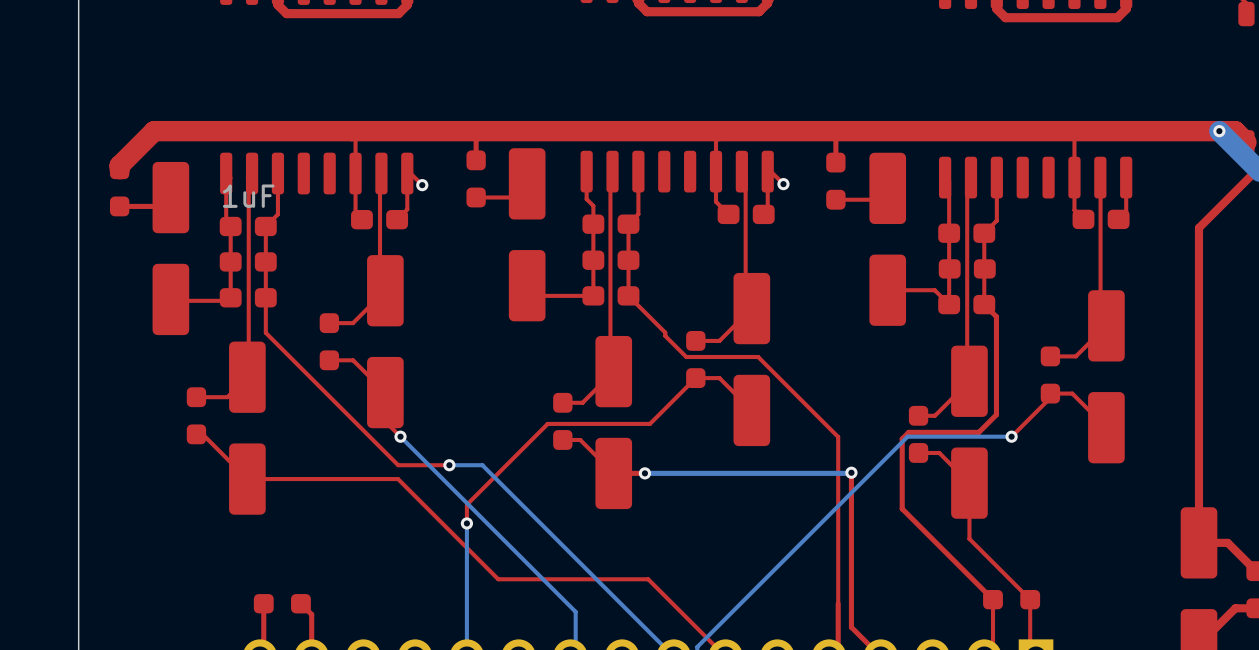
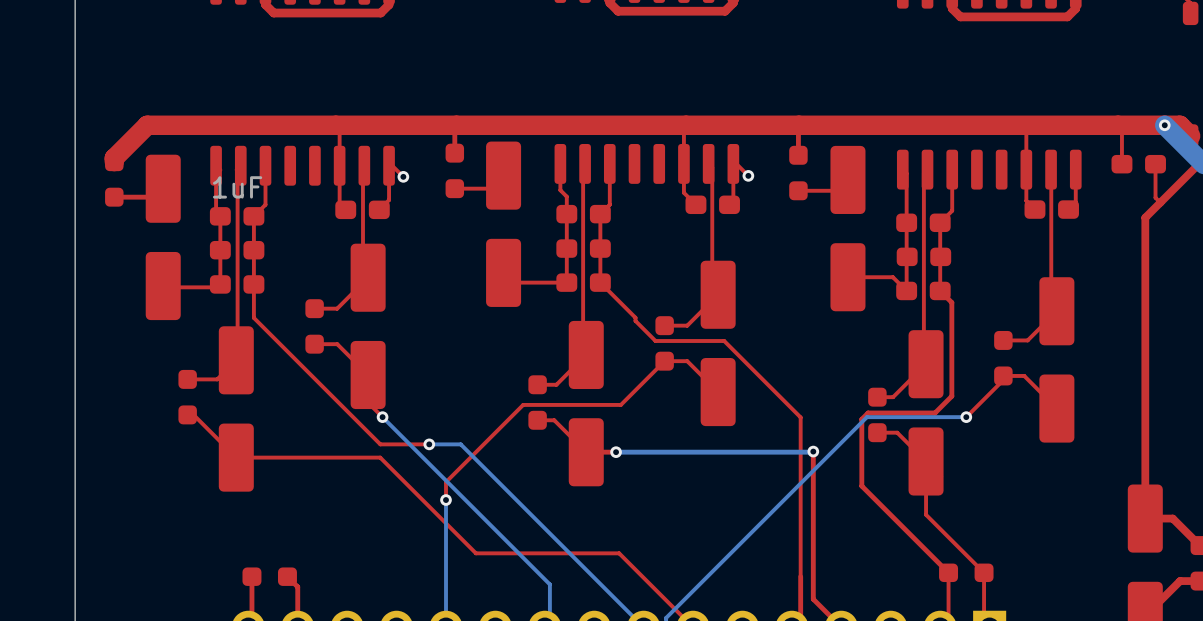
top track: none -> (1118, 125) (1121, 129) (1121, 164)
part: none -> (1138, 164)
top track: none -> (1155, 164) (1155, 197) (1160, 202)

